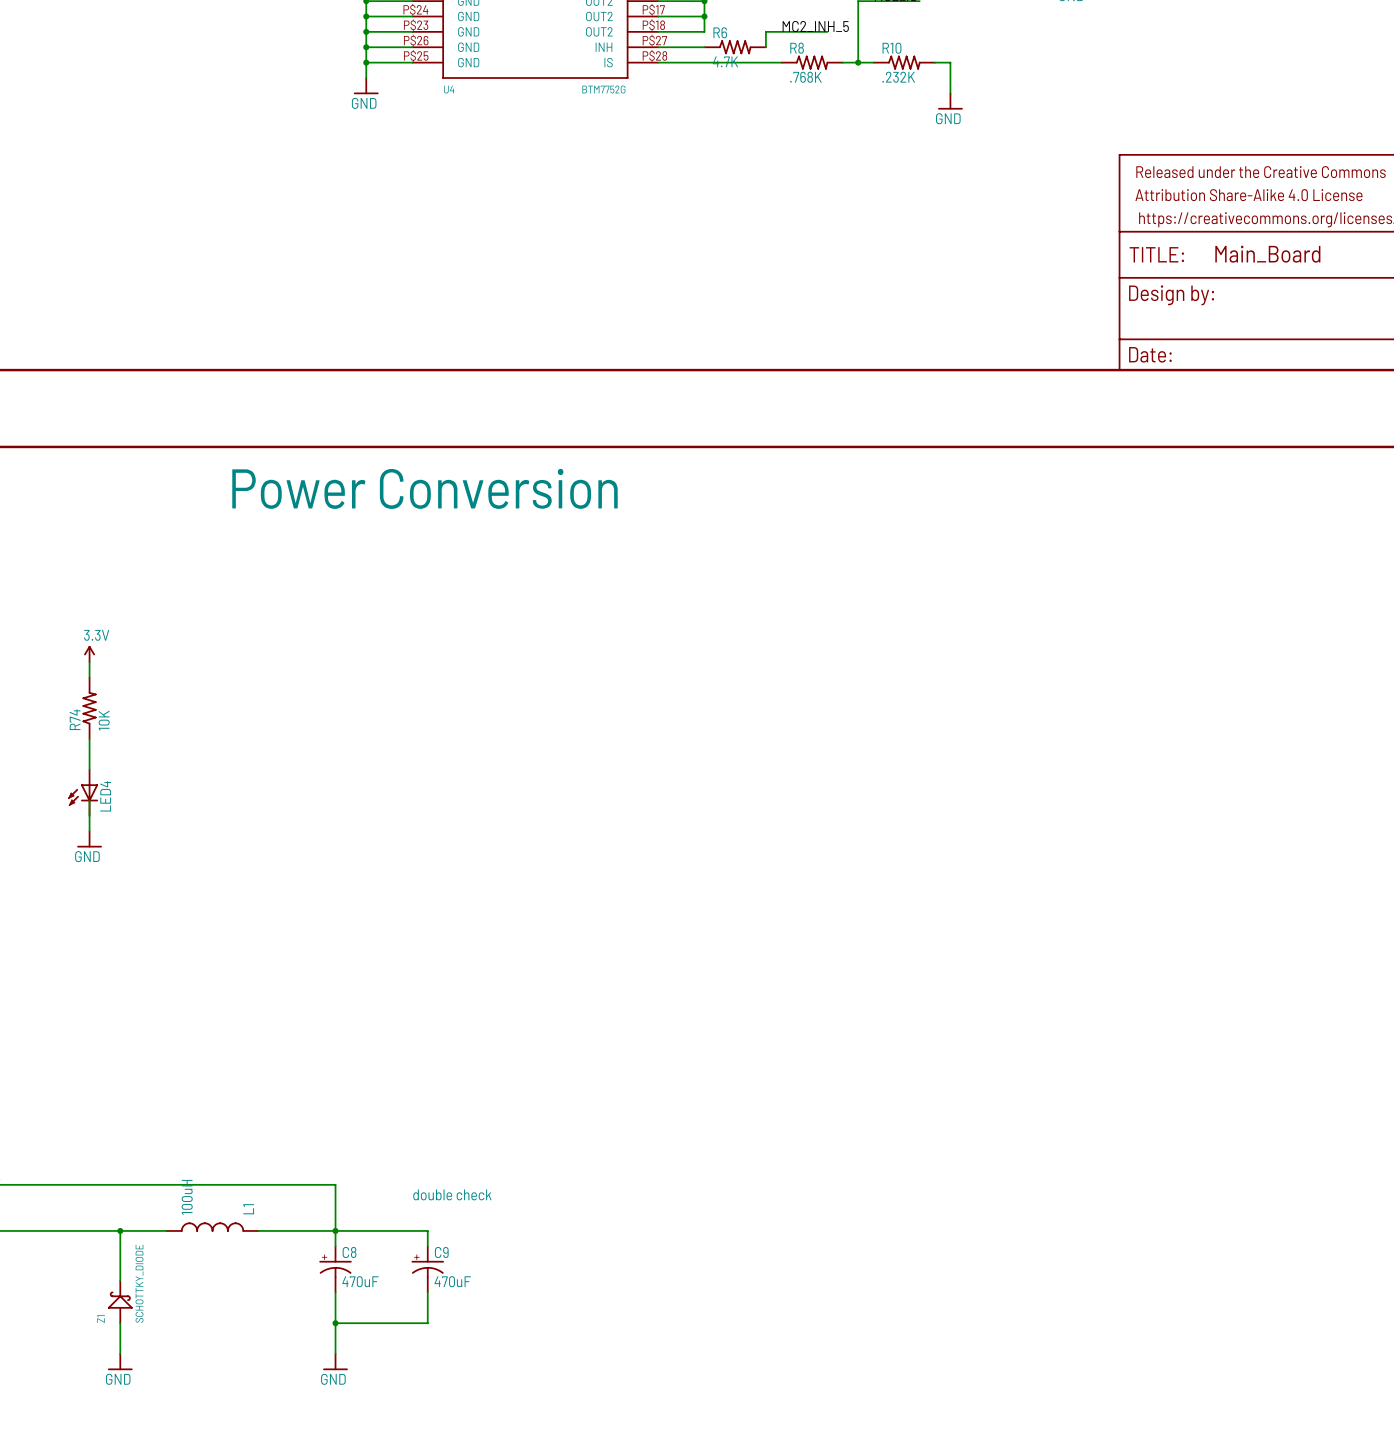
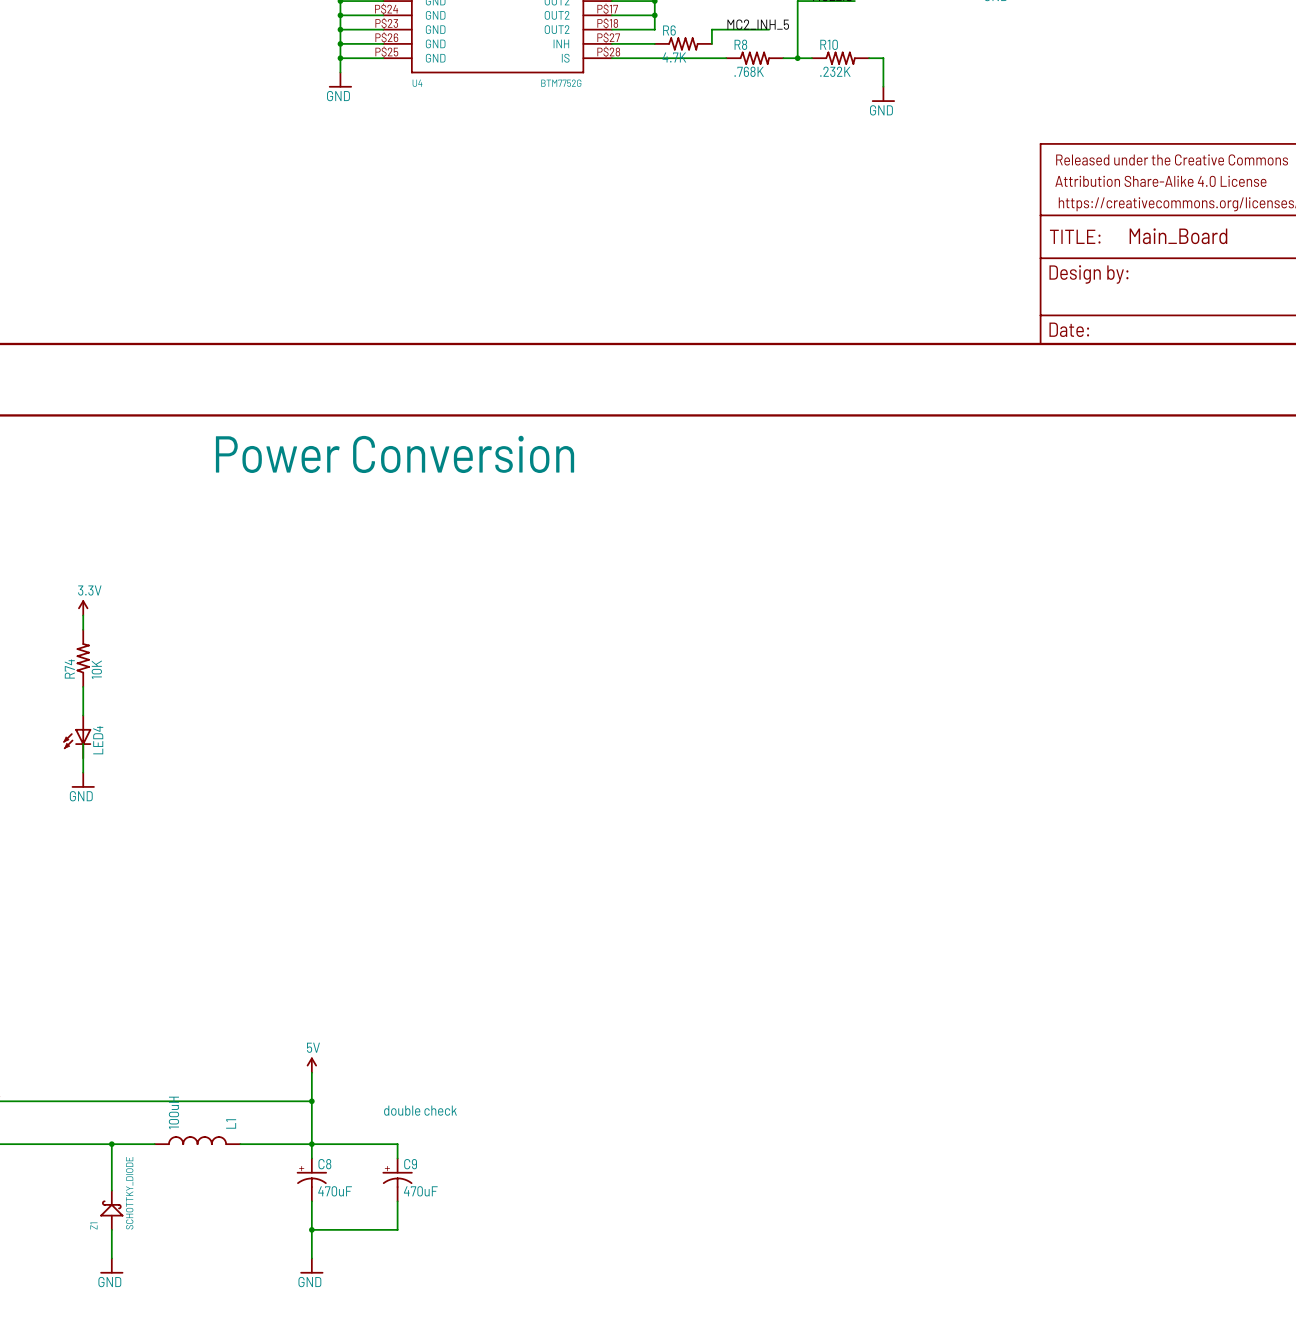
power symbol: none -> 5V (311, 1065)
wire: none -> (311, 1072) (311, 1101)
junction: none -> (311, 1101)

